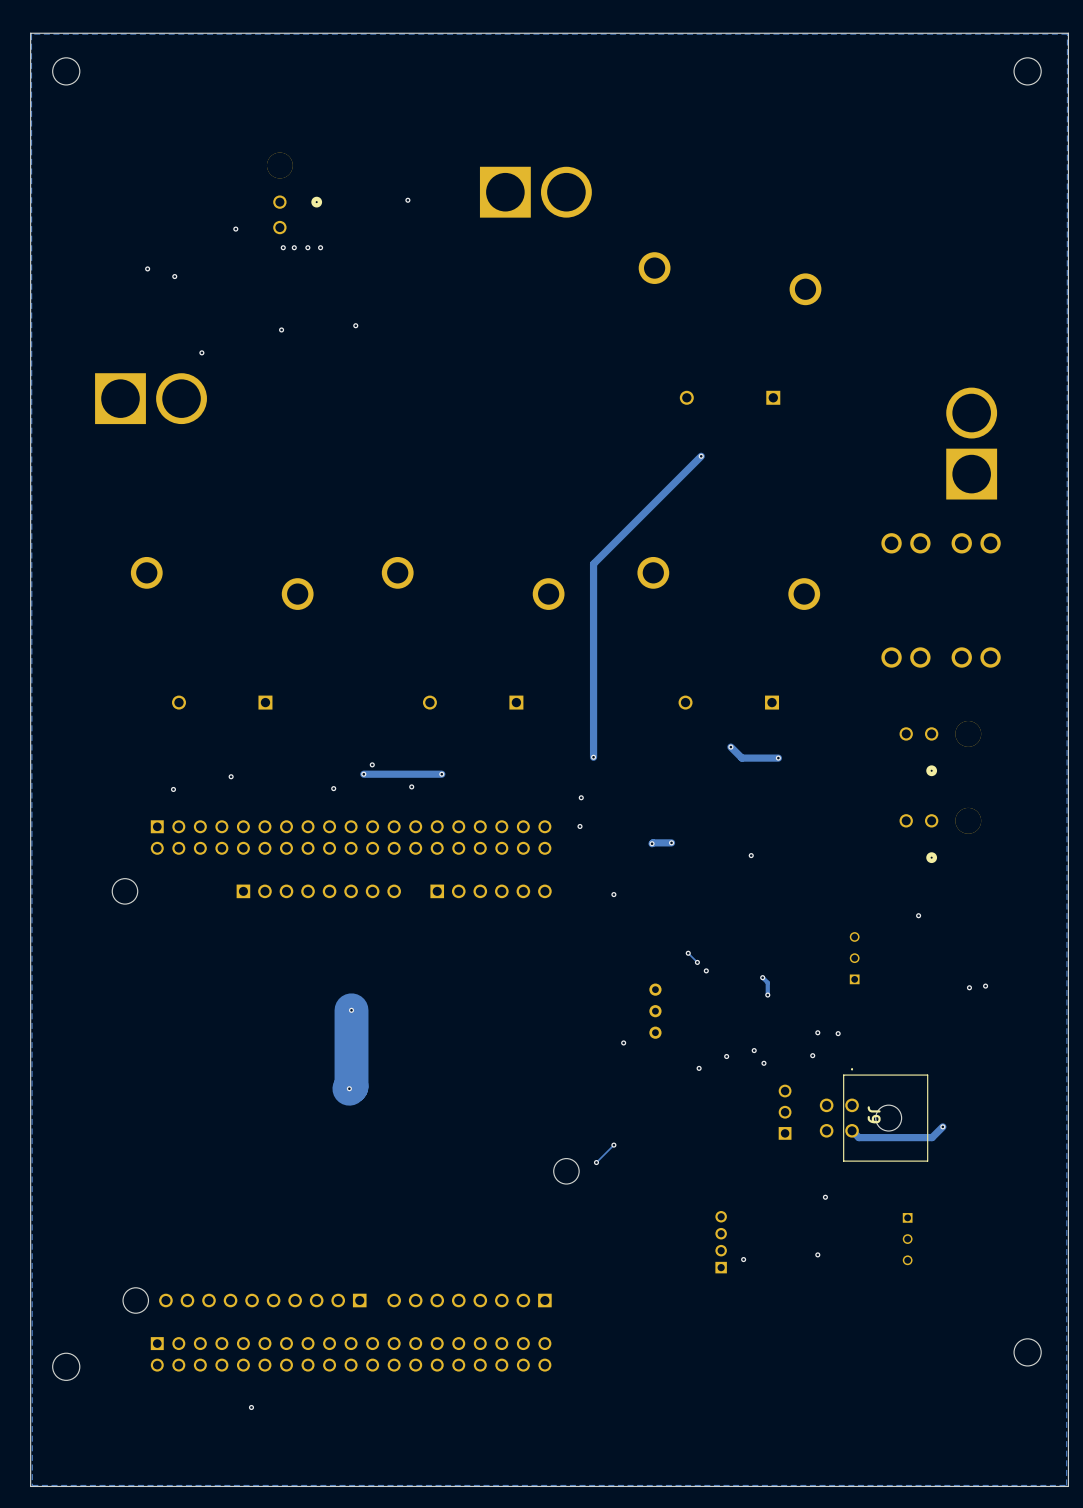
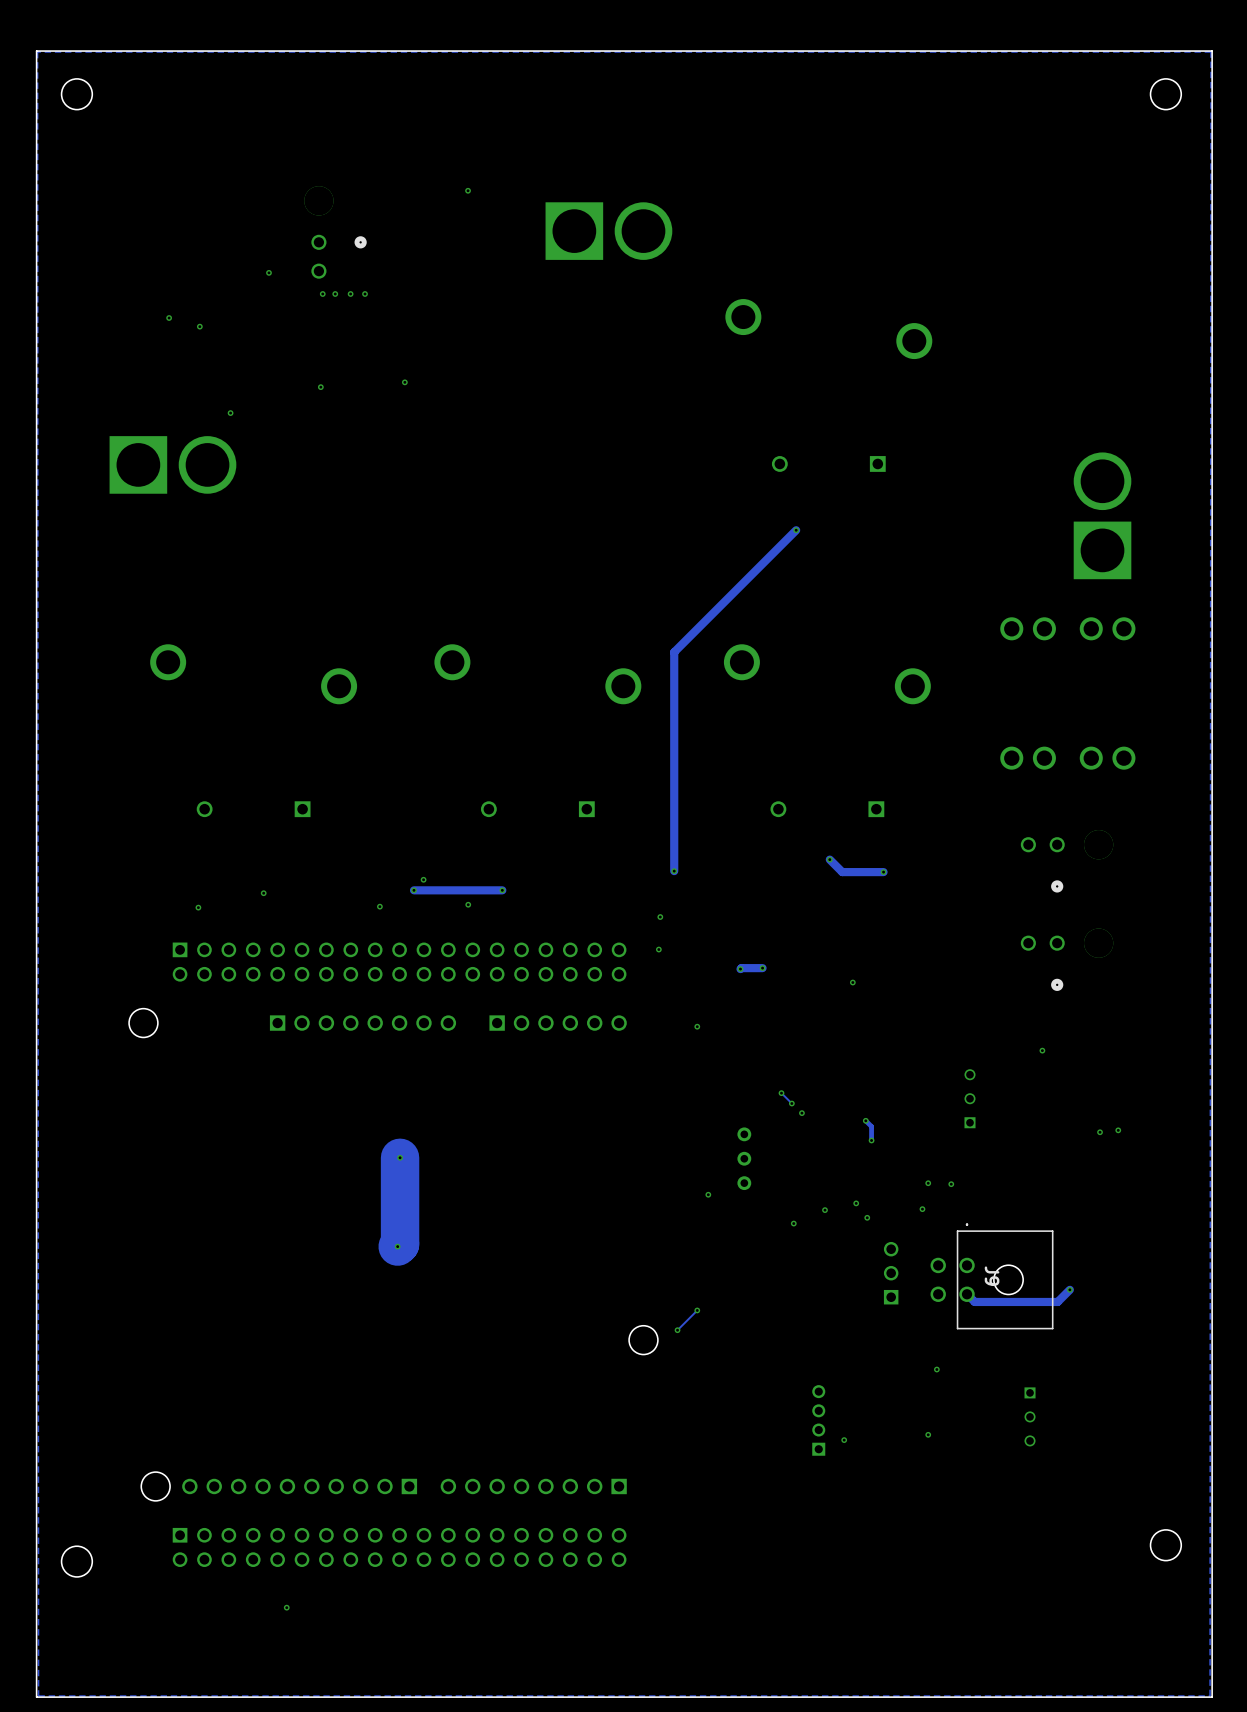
via position: (407, 200) -> (468, 190)

